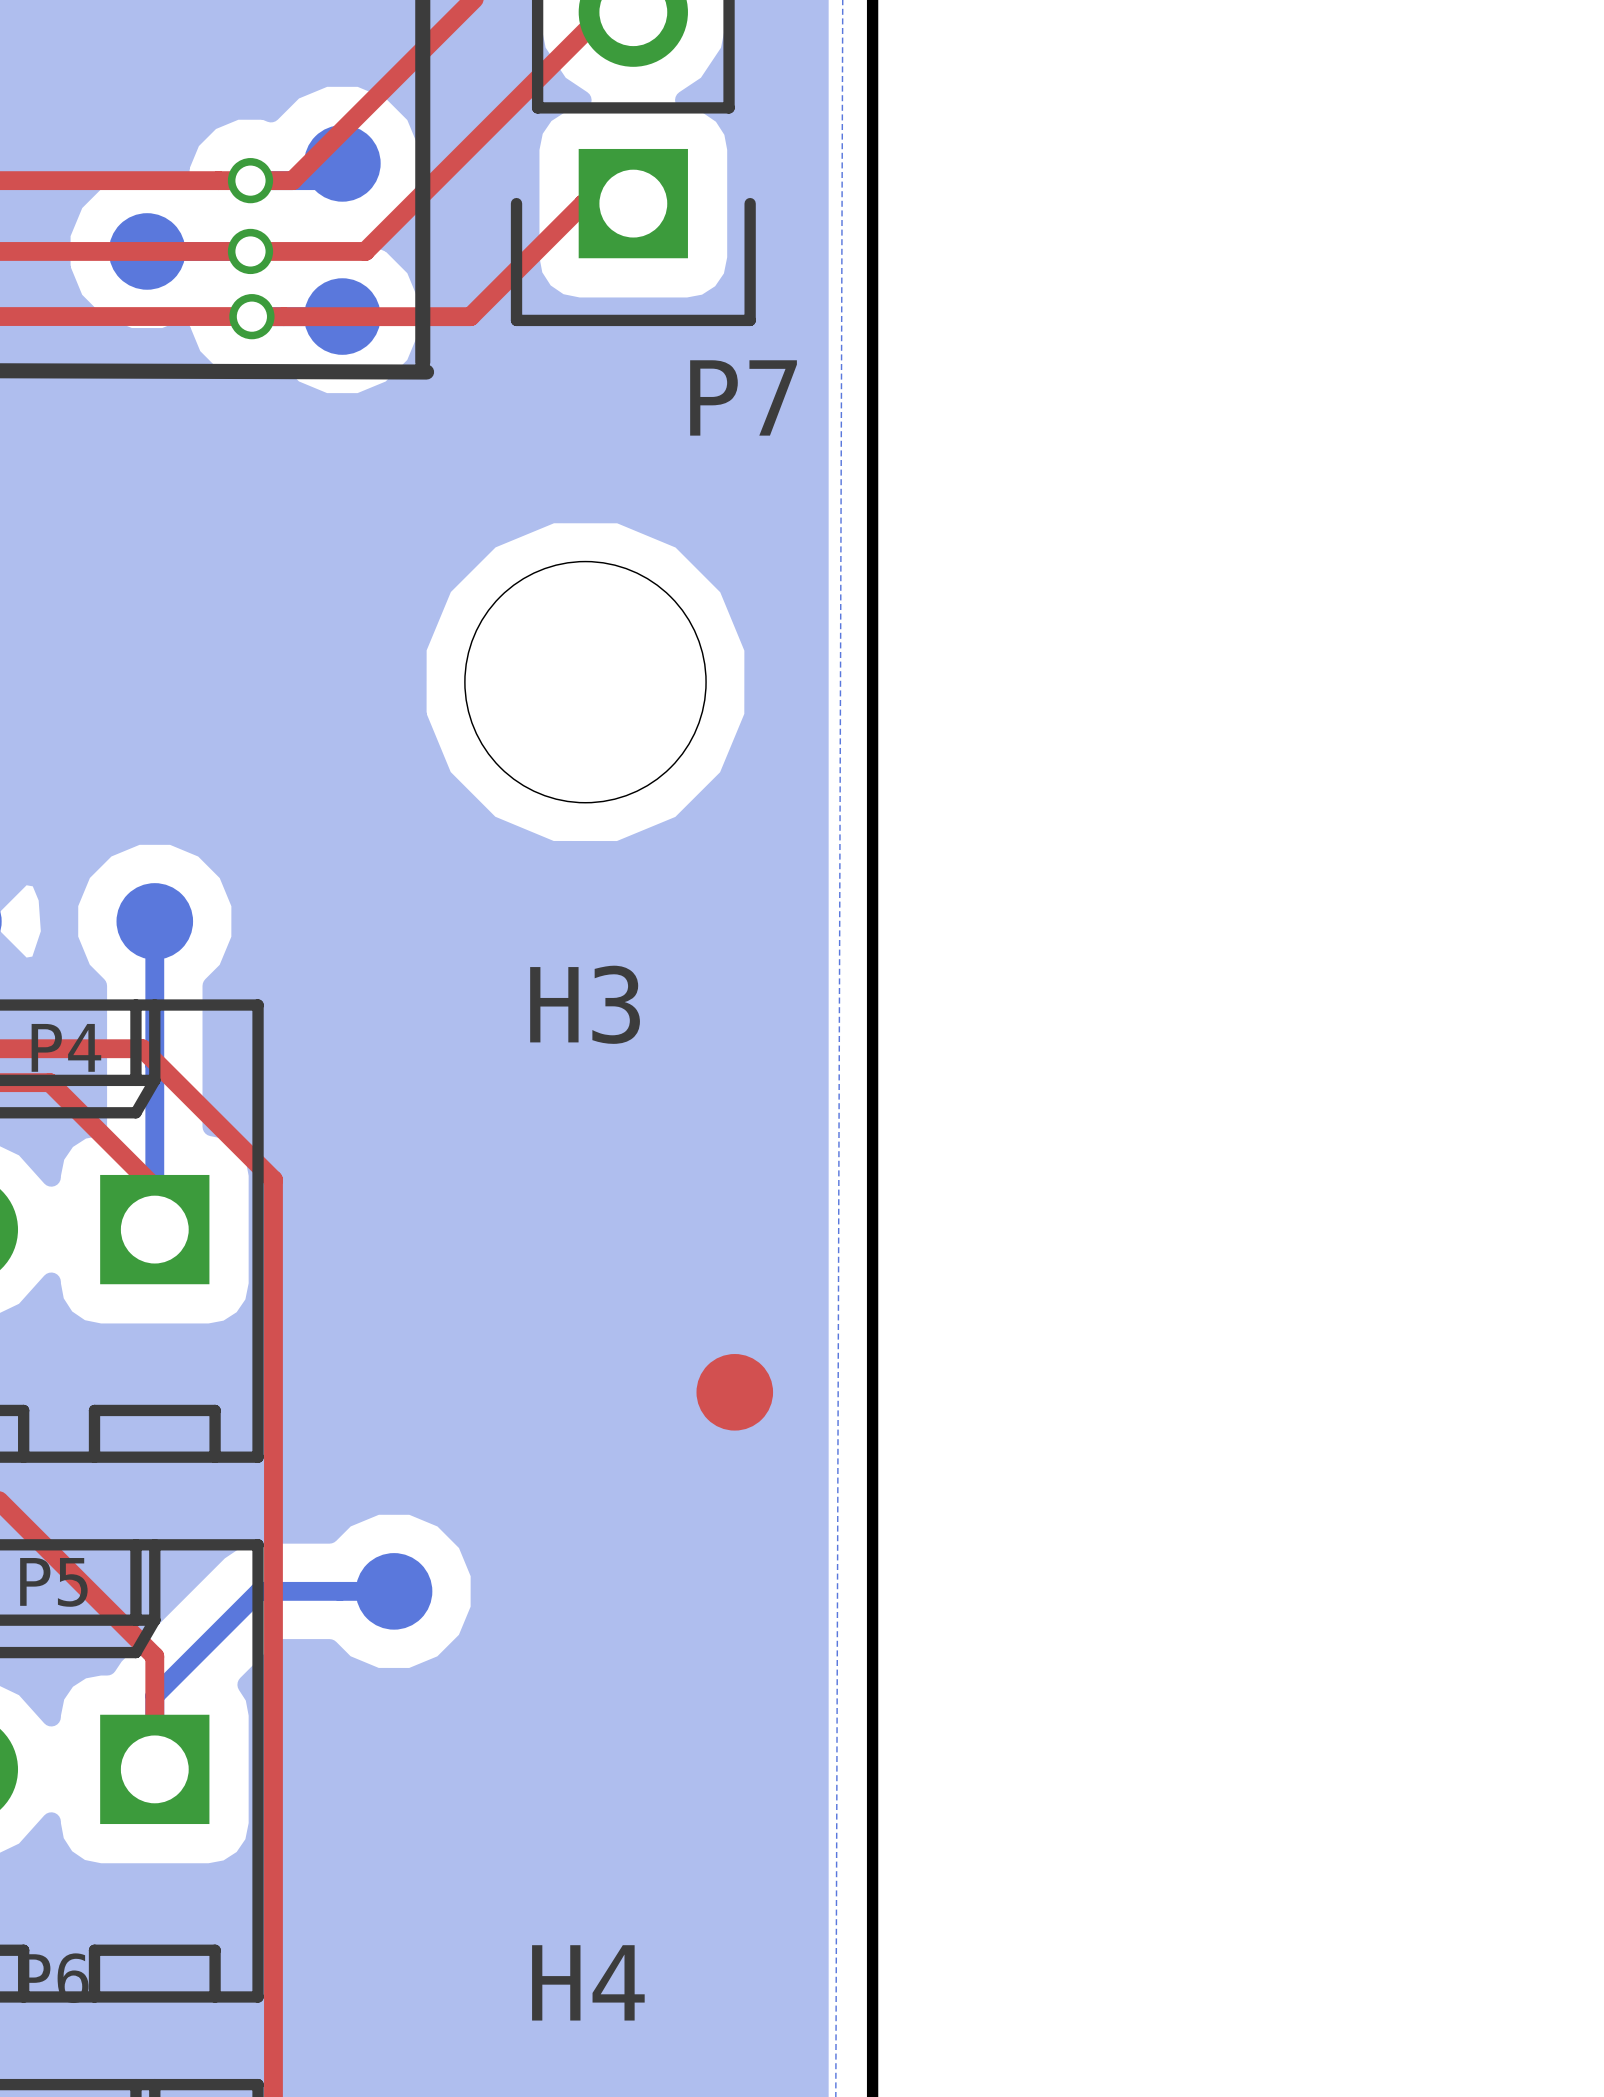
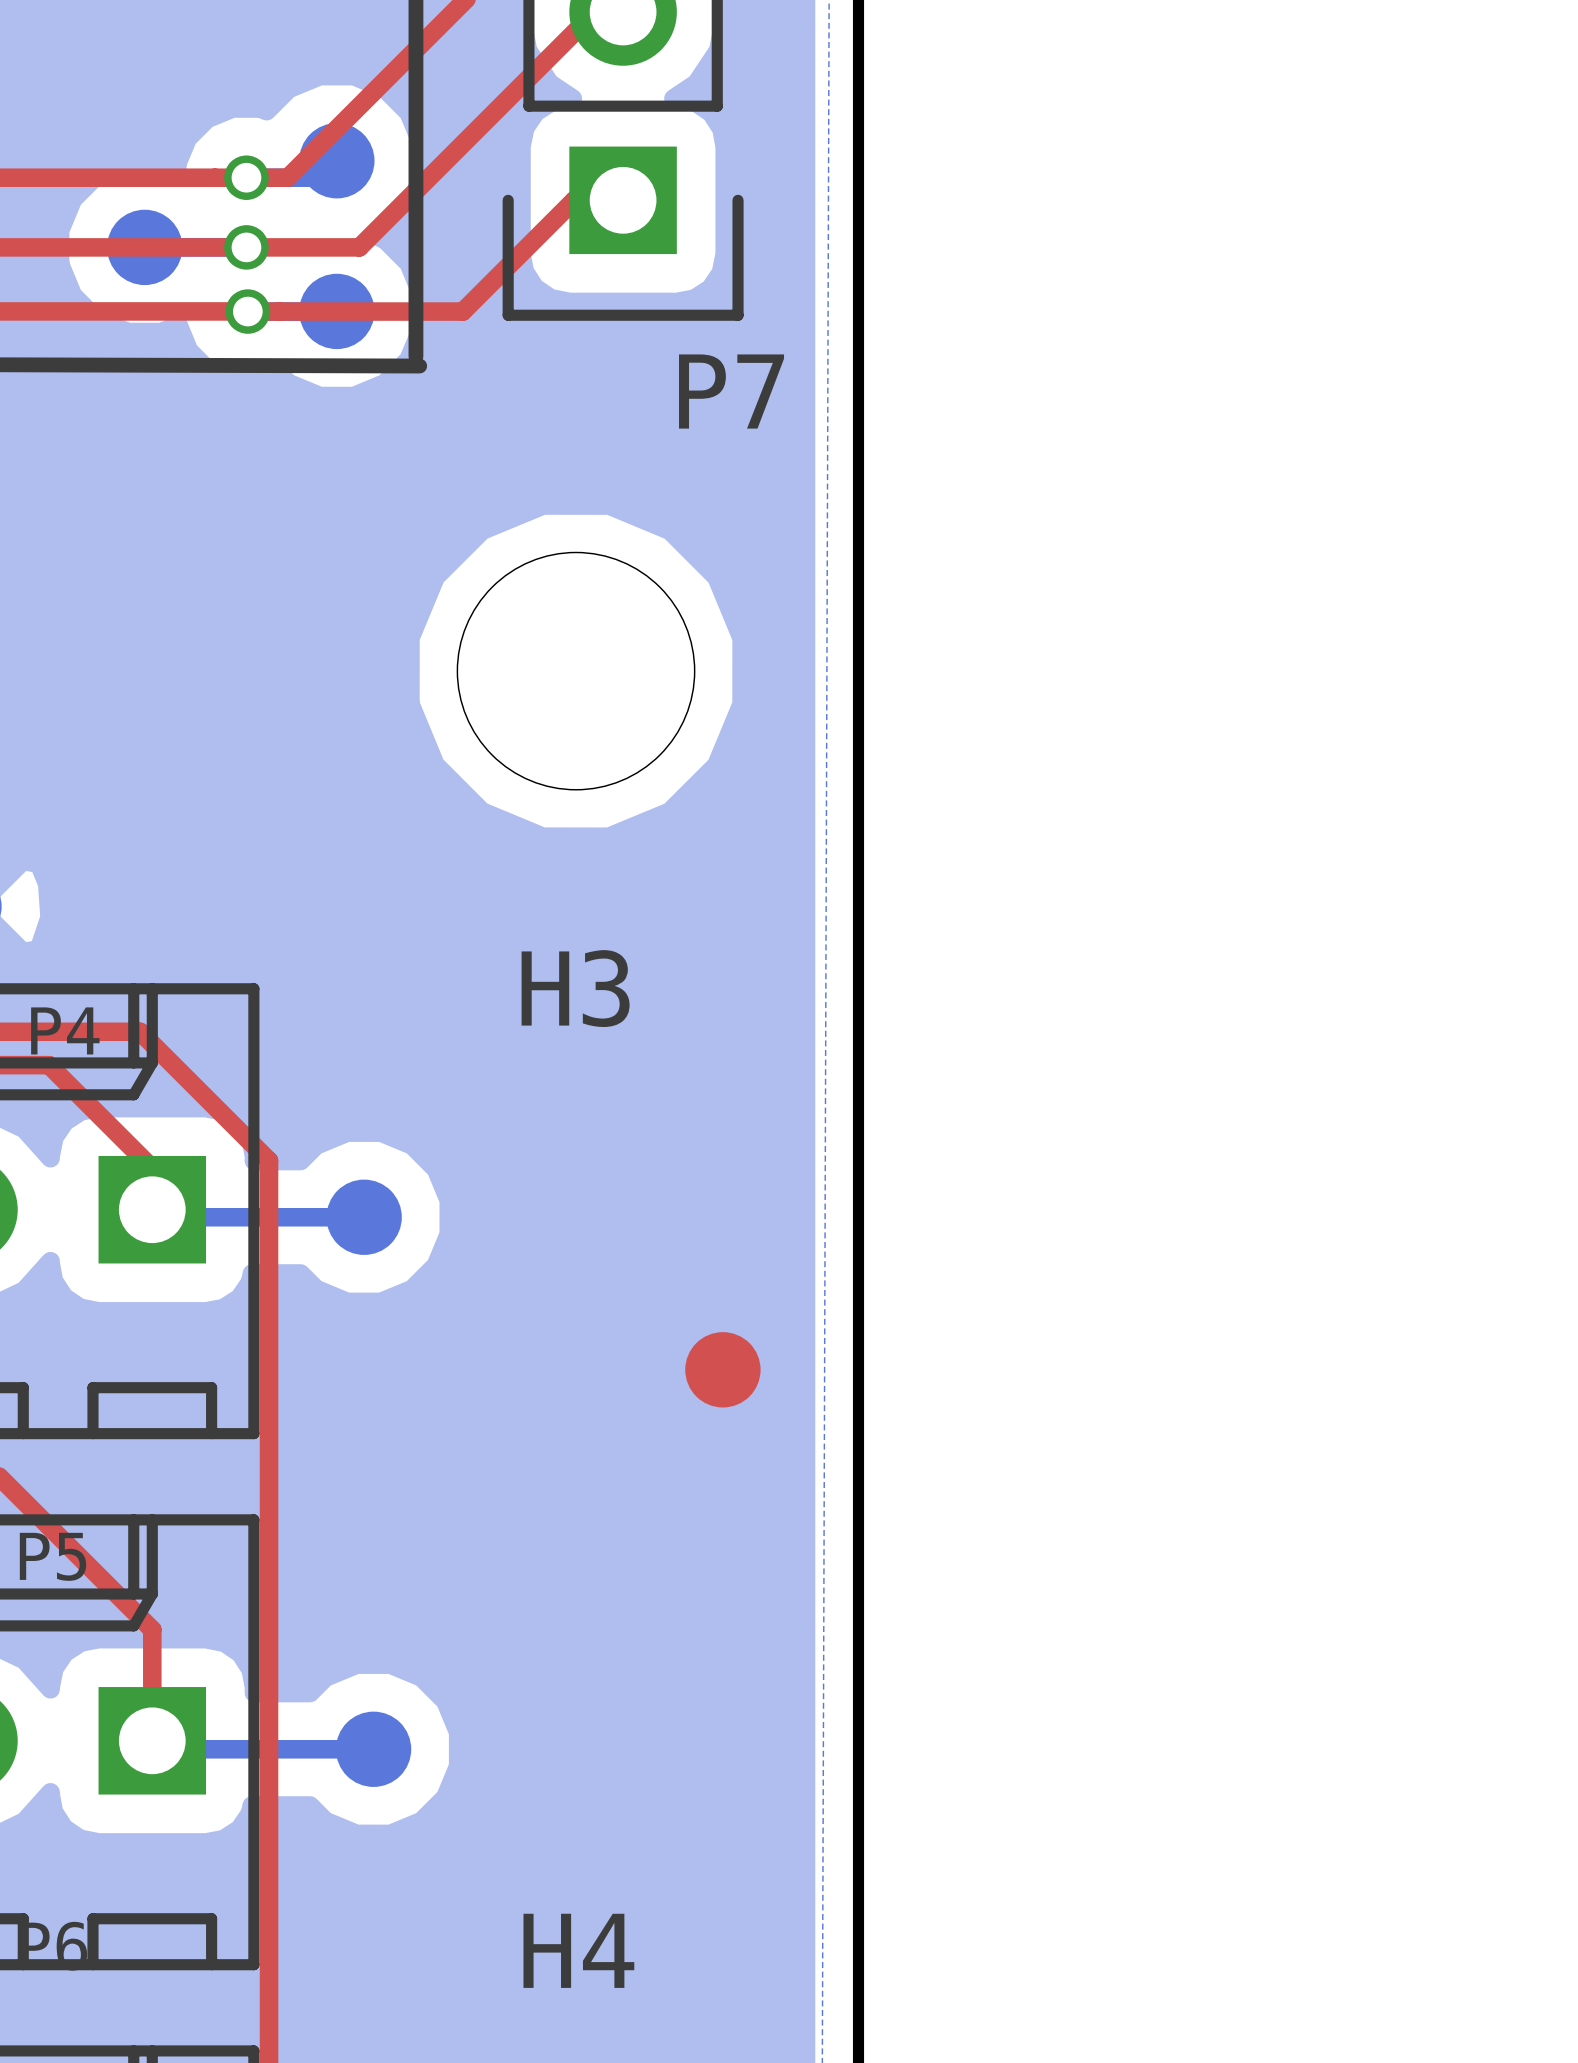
bottom track: (154, 921) (154, 1229) -> (364, 1217) (159, 1217) (152, 1209)
part: (154, 921) -> none
part: none -> (364, 1217)
bottom track: (394, 1591) (259, 1591) (154, 1695) (154, 1769) -> (373, 1749) (160, 1749) (152, 1740)
part: (394, 1591) -> none
part: none -> (373, 1749)

